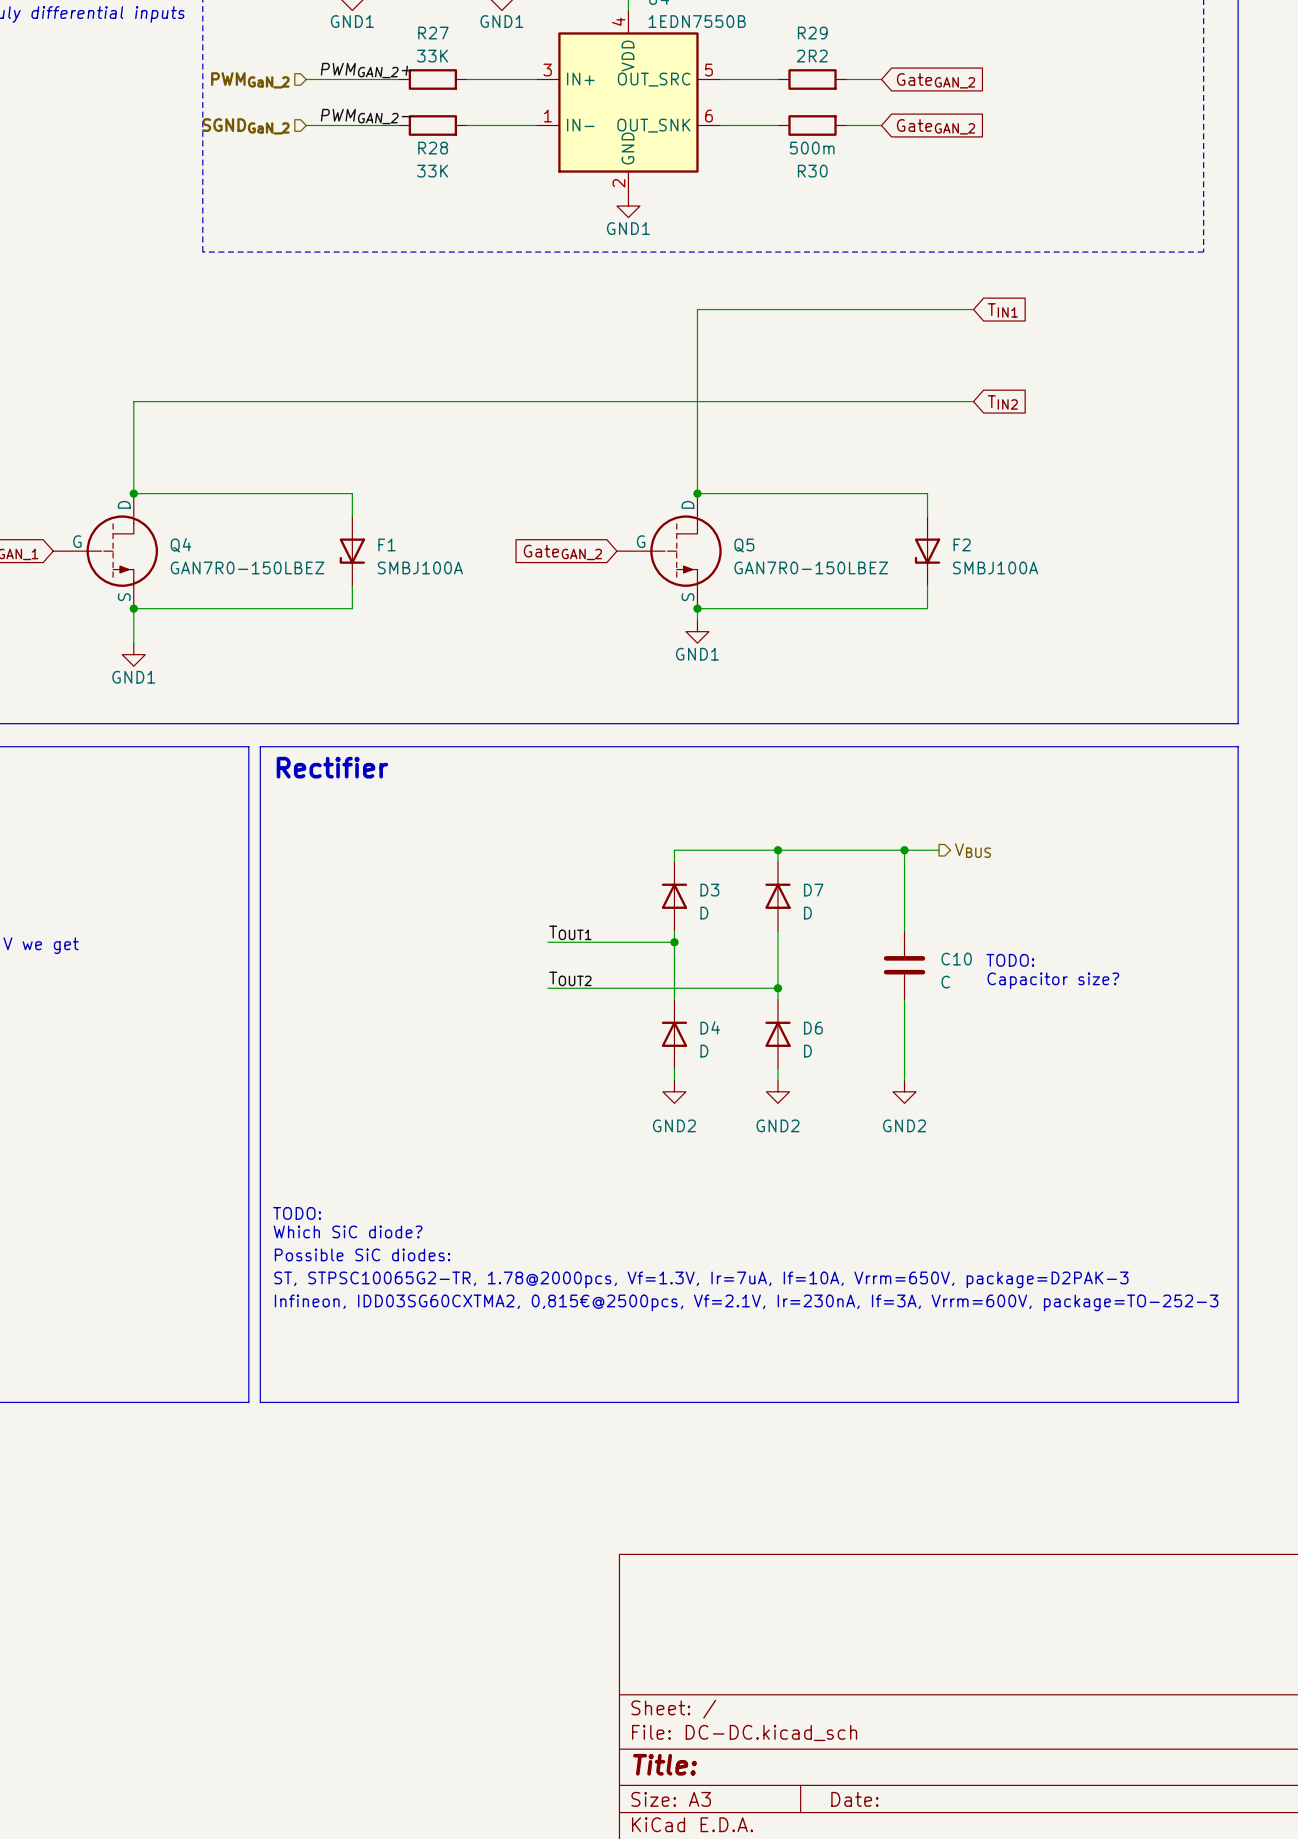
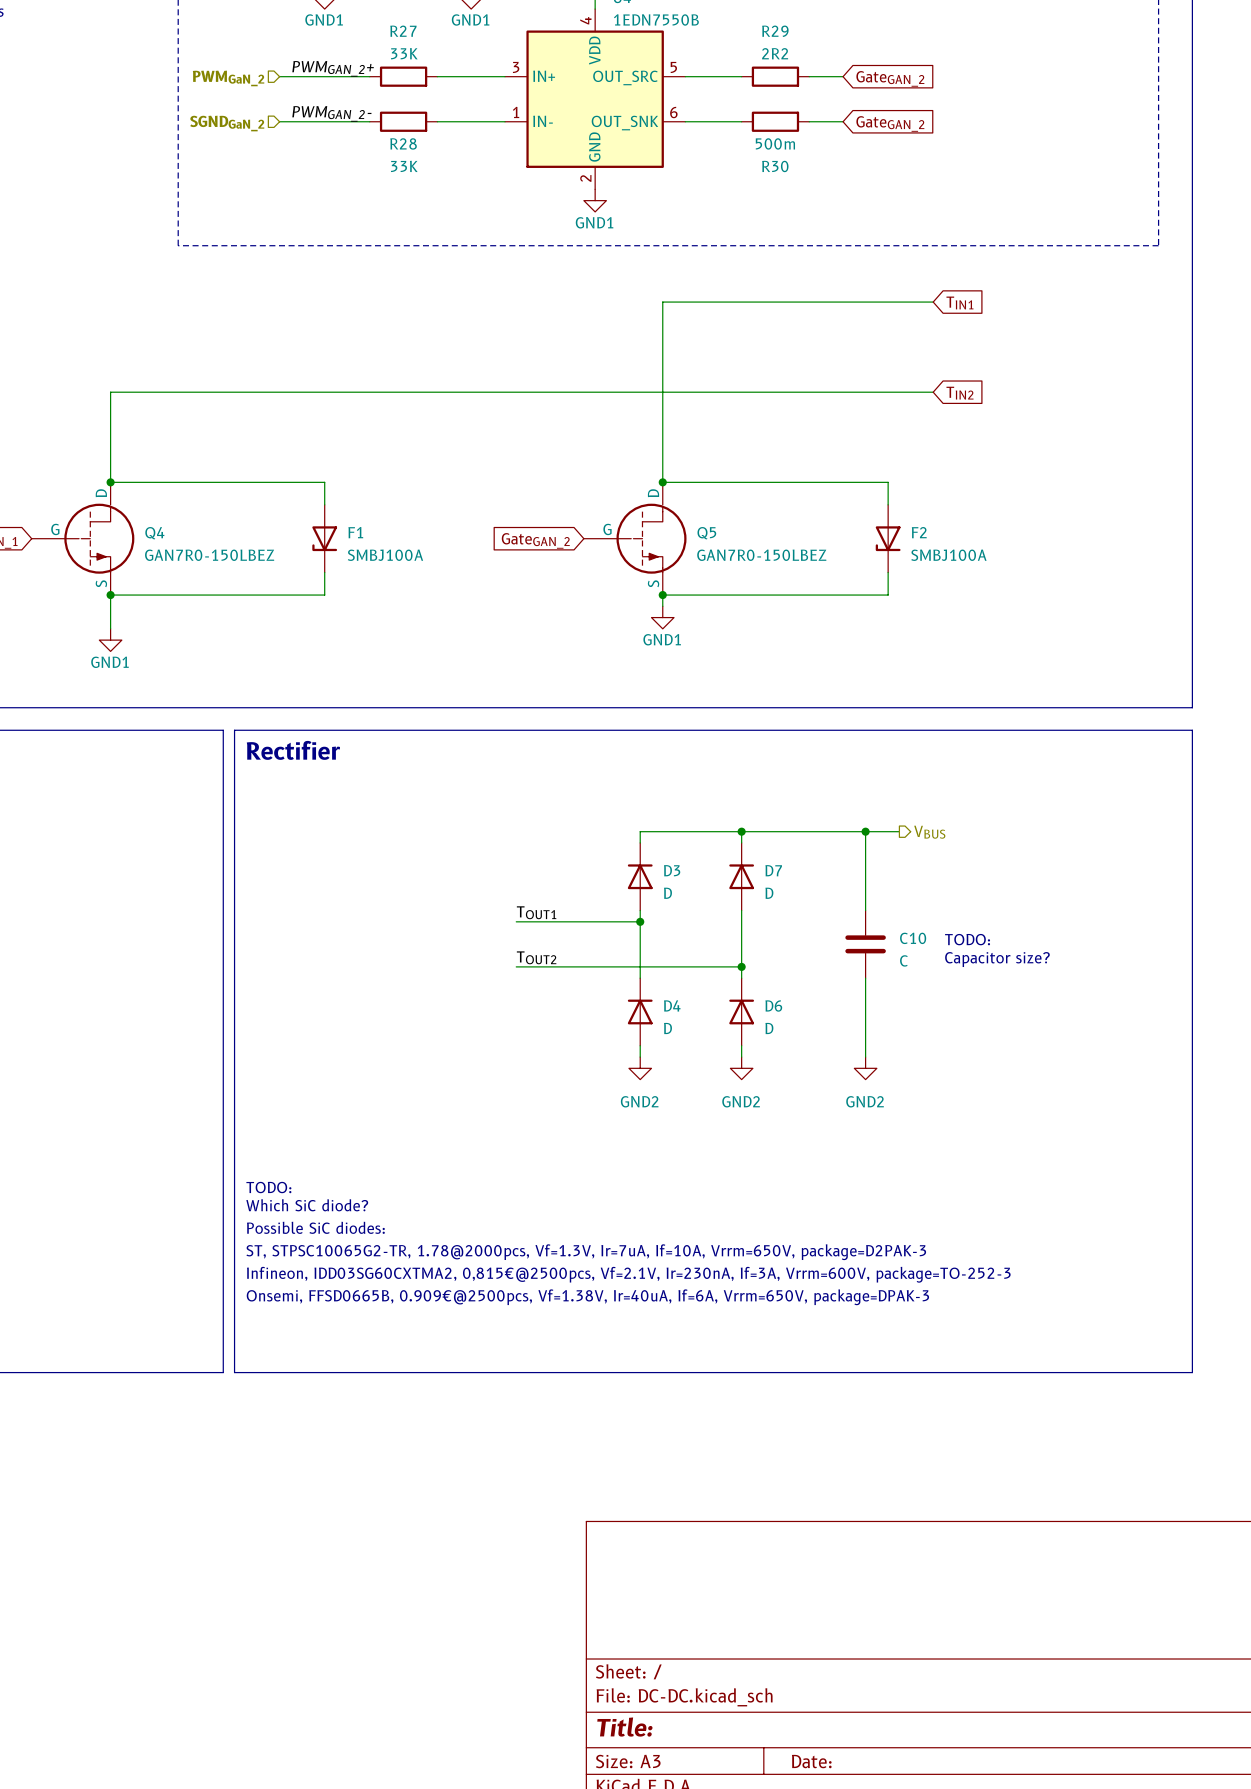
text: none -> Onsemi, FFSD0665B, 0.909€@2500pcs, Vf=1.38V, Ir=40uA, If=6A, Vrrm=650V, package=DPAK-3 (587, 1297)

